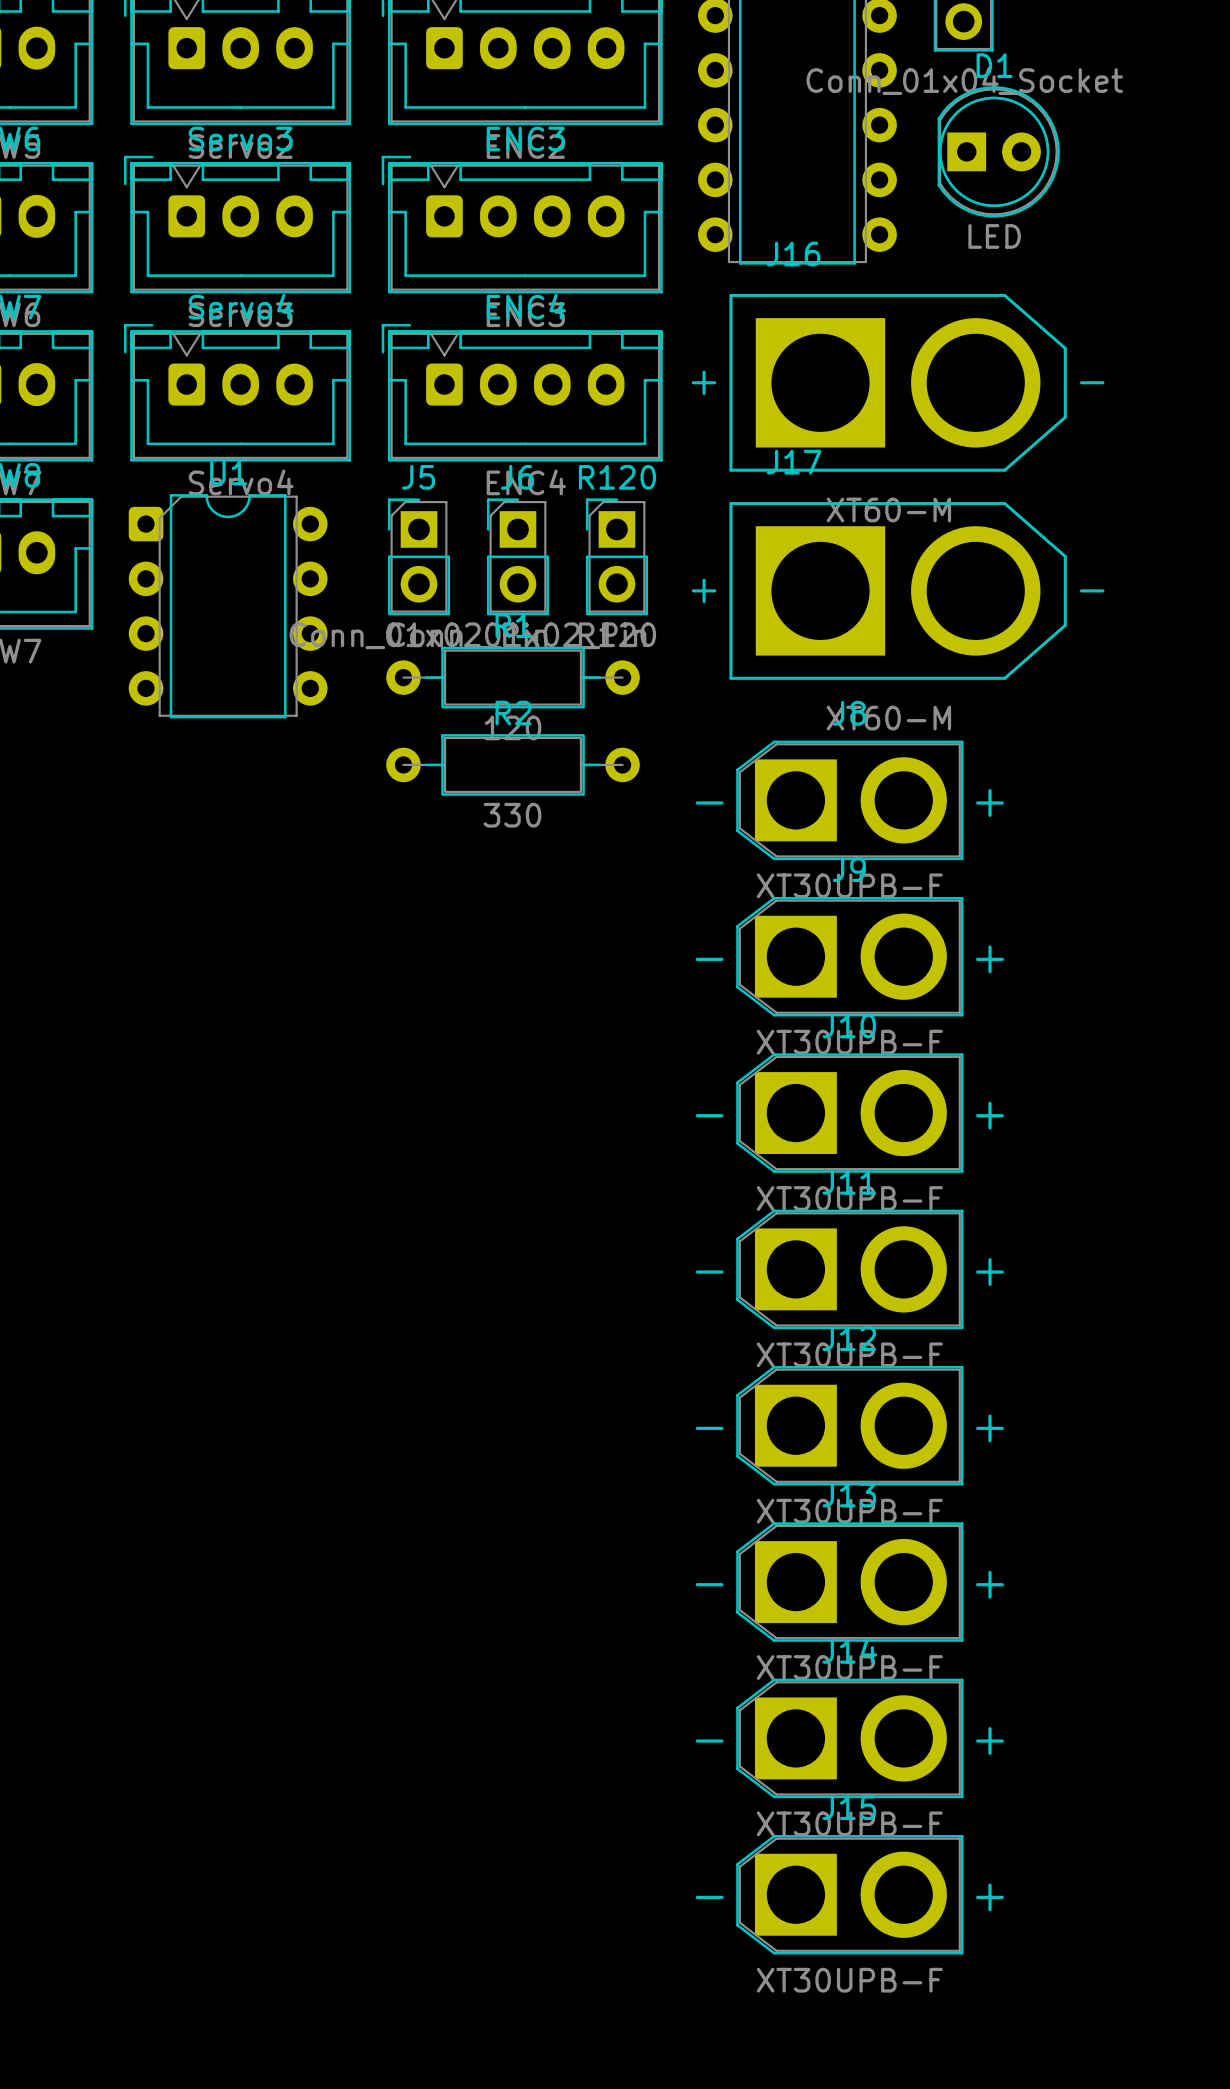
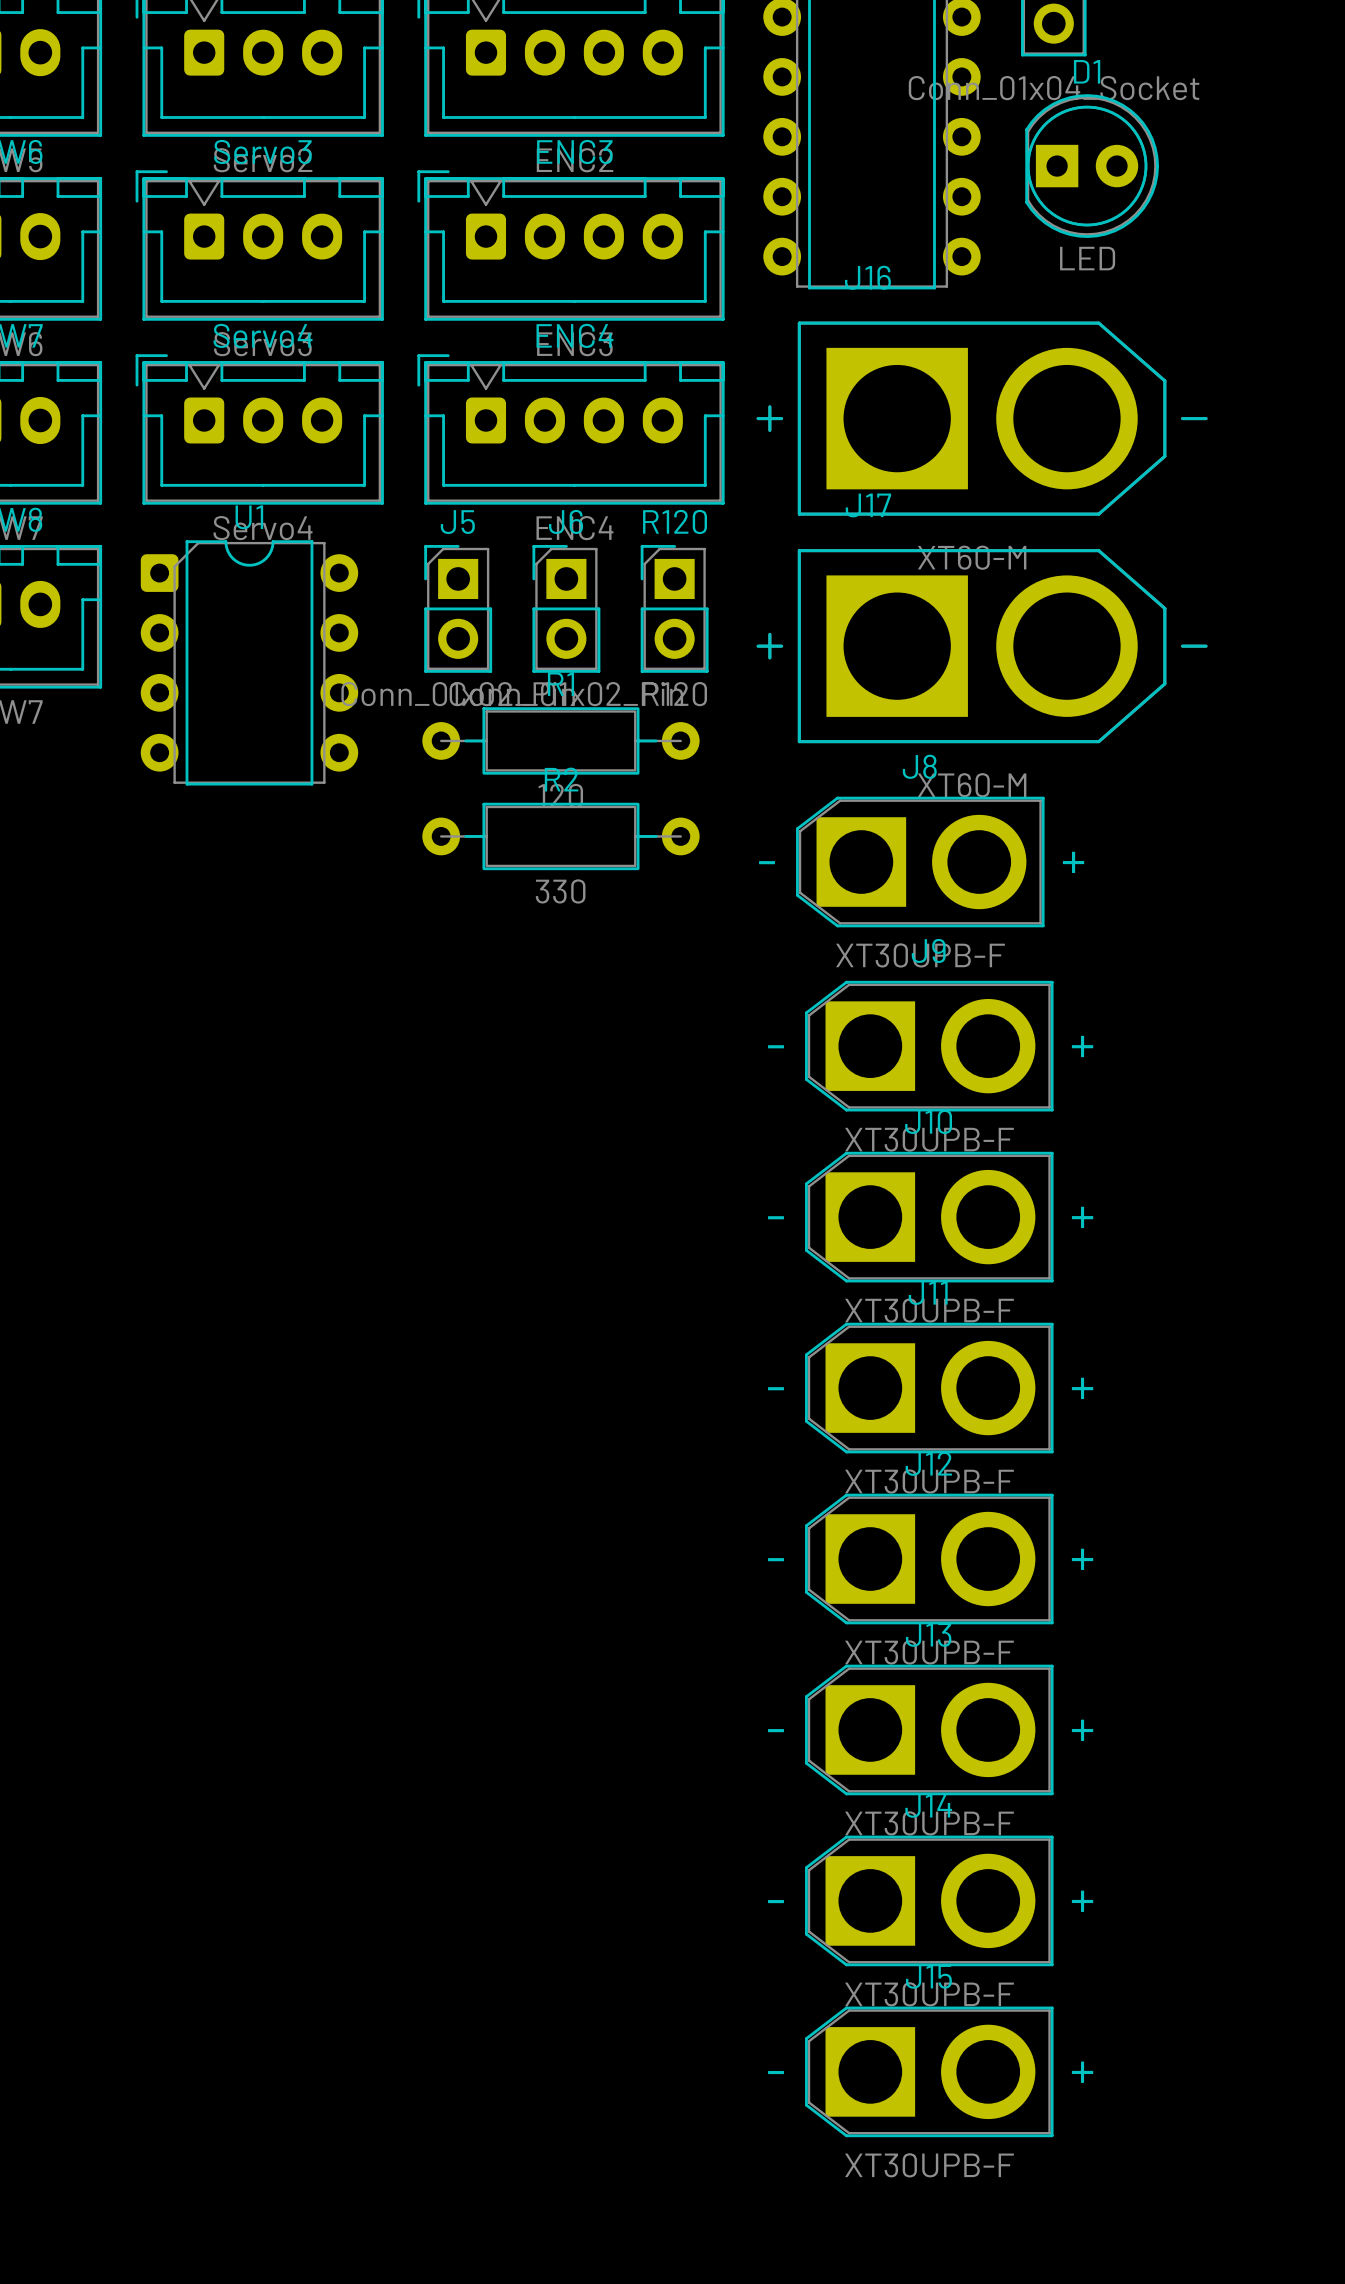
J8 position: (849, 800) -> (920, 862)

